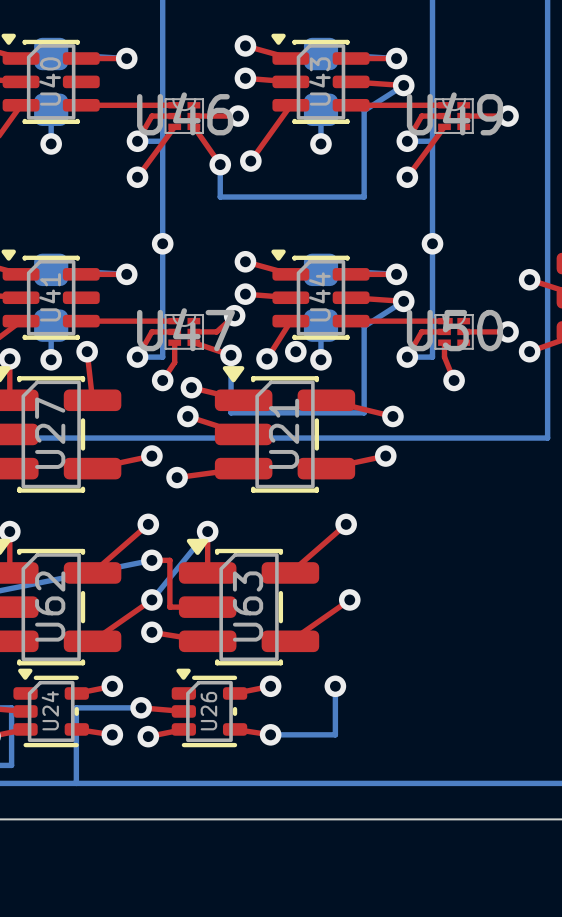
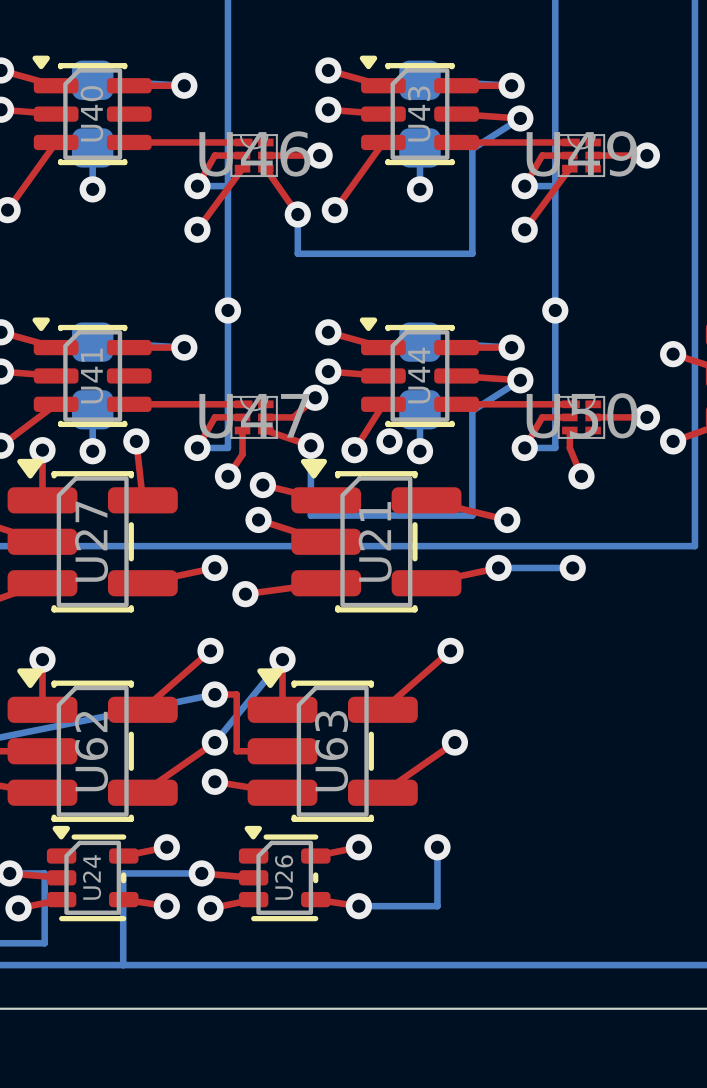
bottom track: none -> (498, 567) (572, 567)
via: none -> (572, 567)

